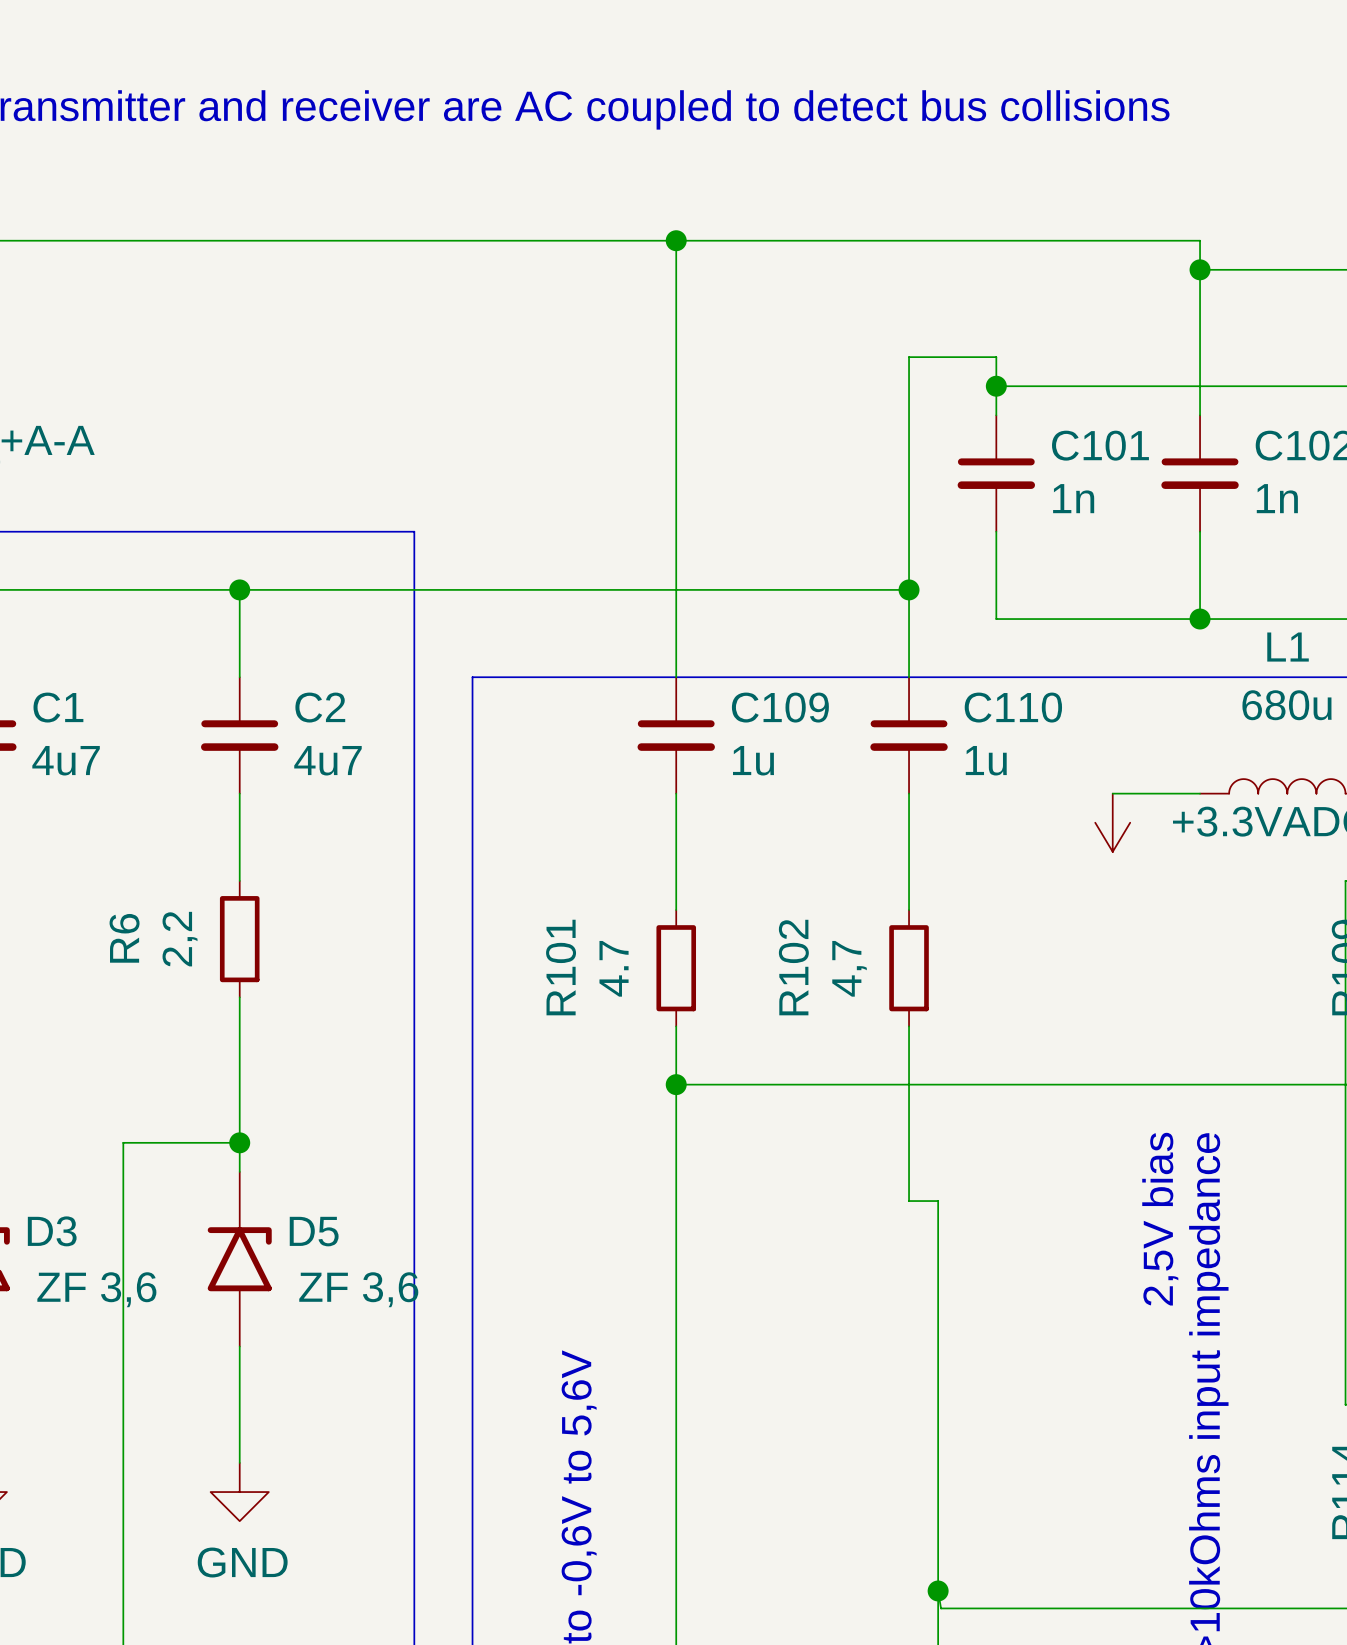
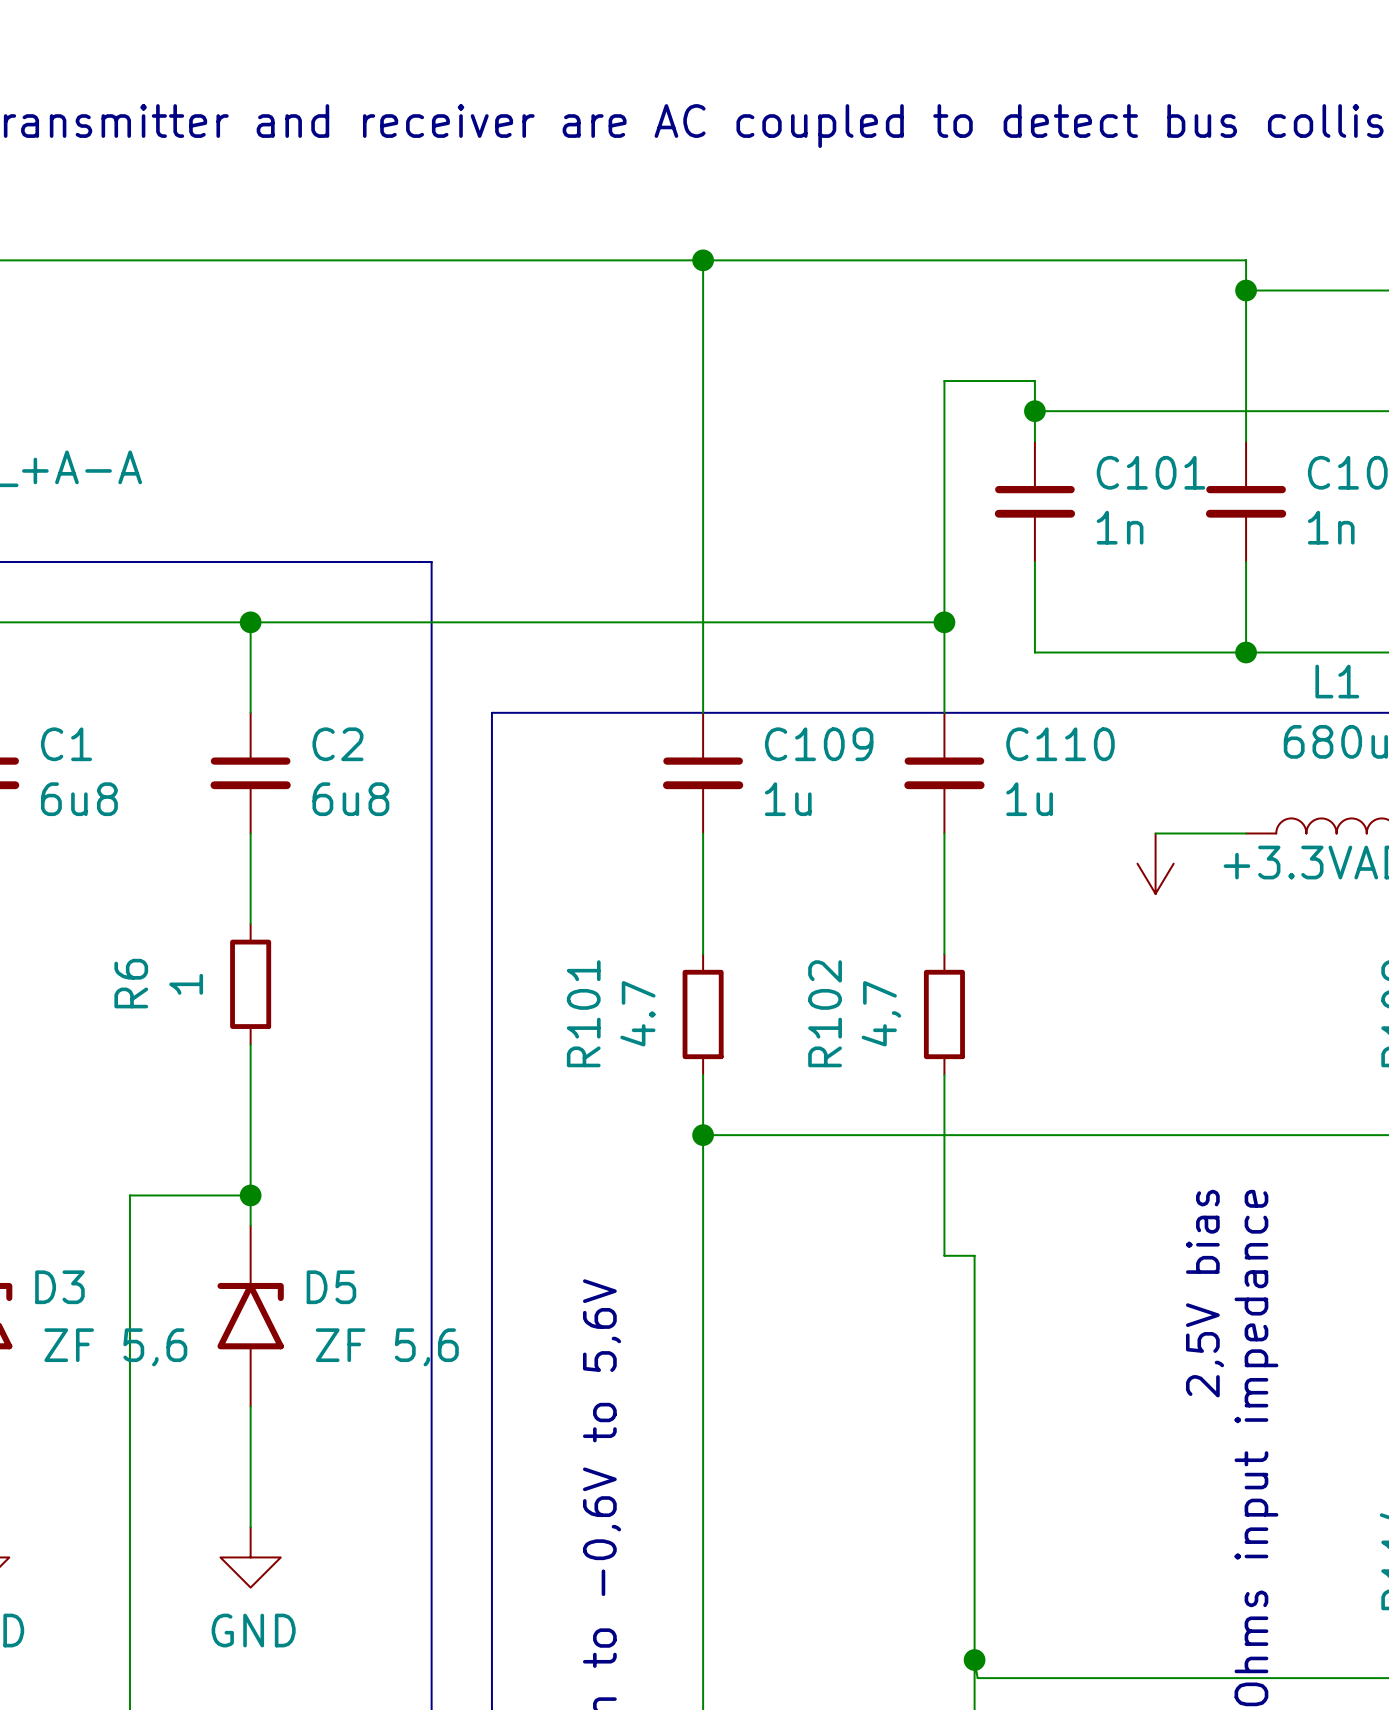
C1 value: 4u7 (66, 760) -> 6u8 (79, 799)
C2 value: 4u7 (327, 760) -> 6u8 (350, 799)
R6 value: 2,2 (180, 939) -> 1 (186, 984)
D3 value: ZF 3,6 (96, 1289) -> ZF 5,6 (115, 1347)
D5 value: ZF 3,6 (358, 1289) -> ZF 5,6 (387, 1347)

